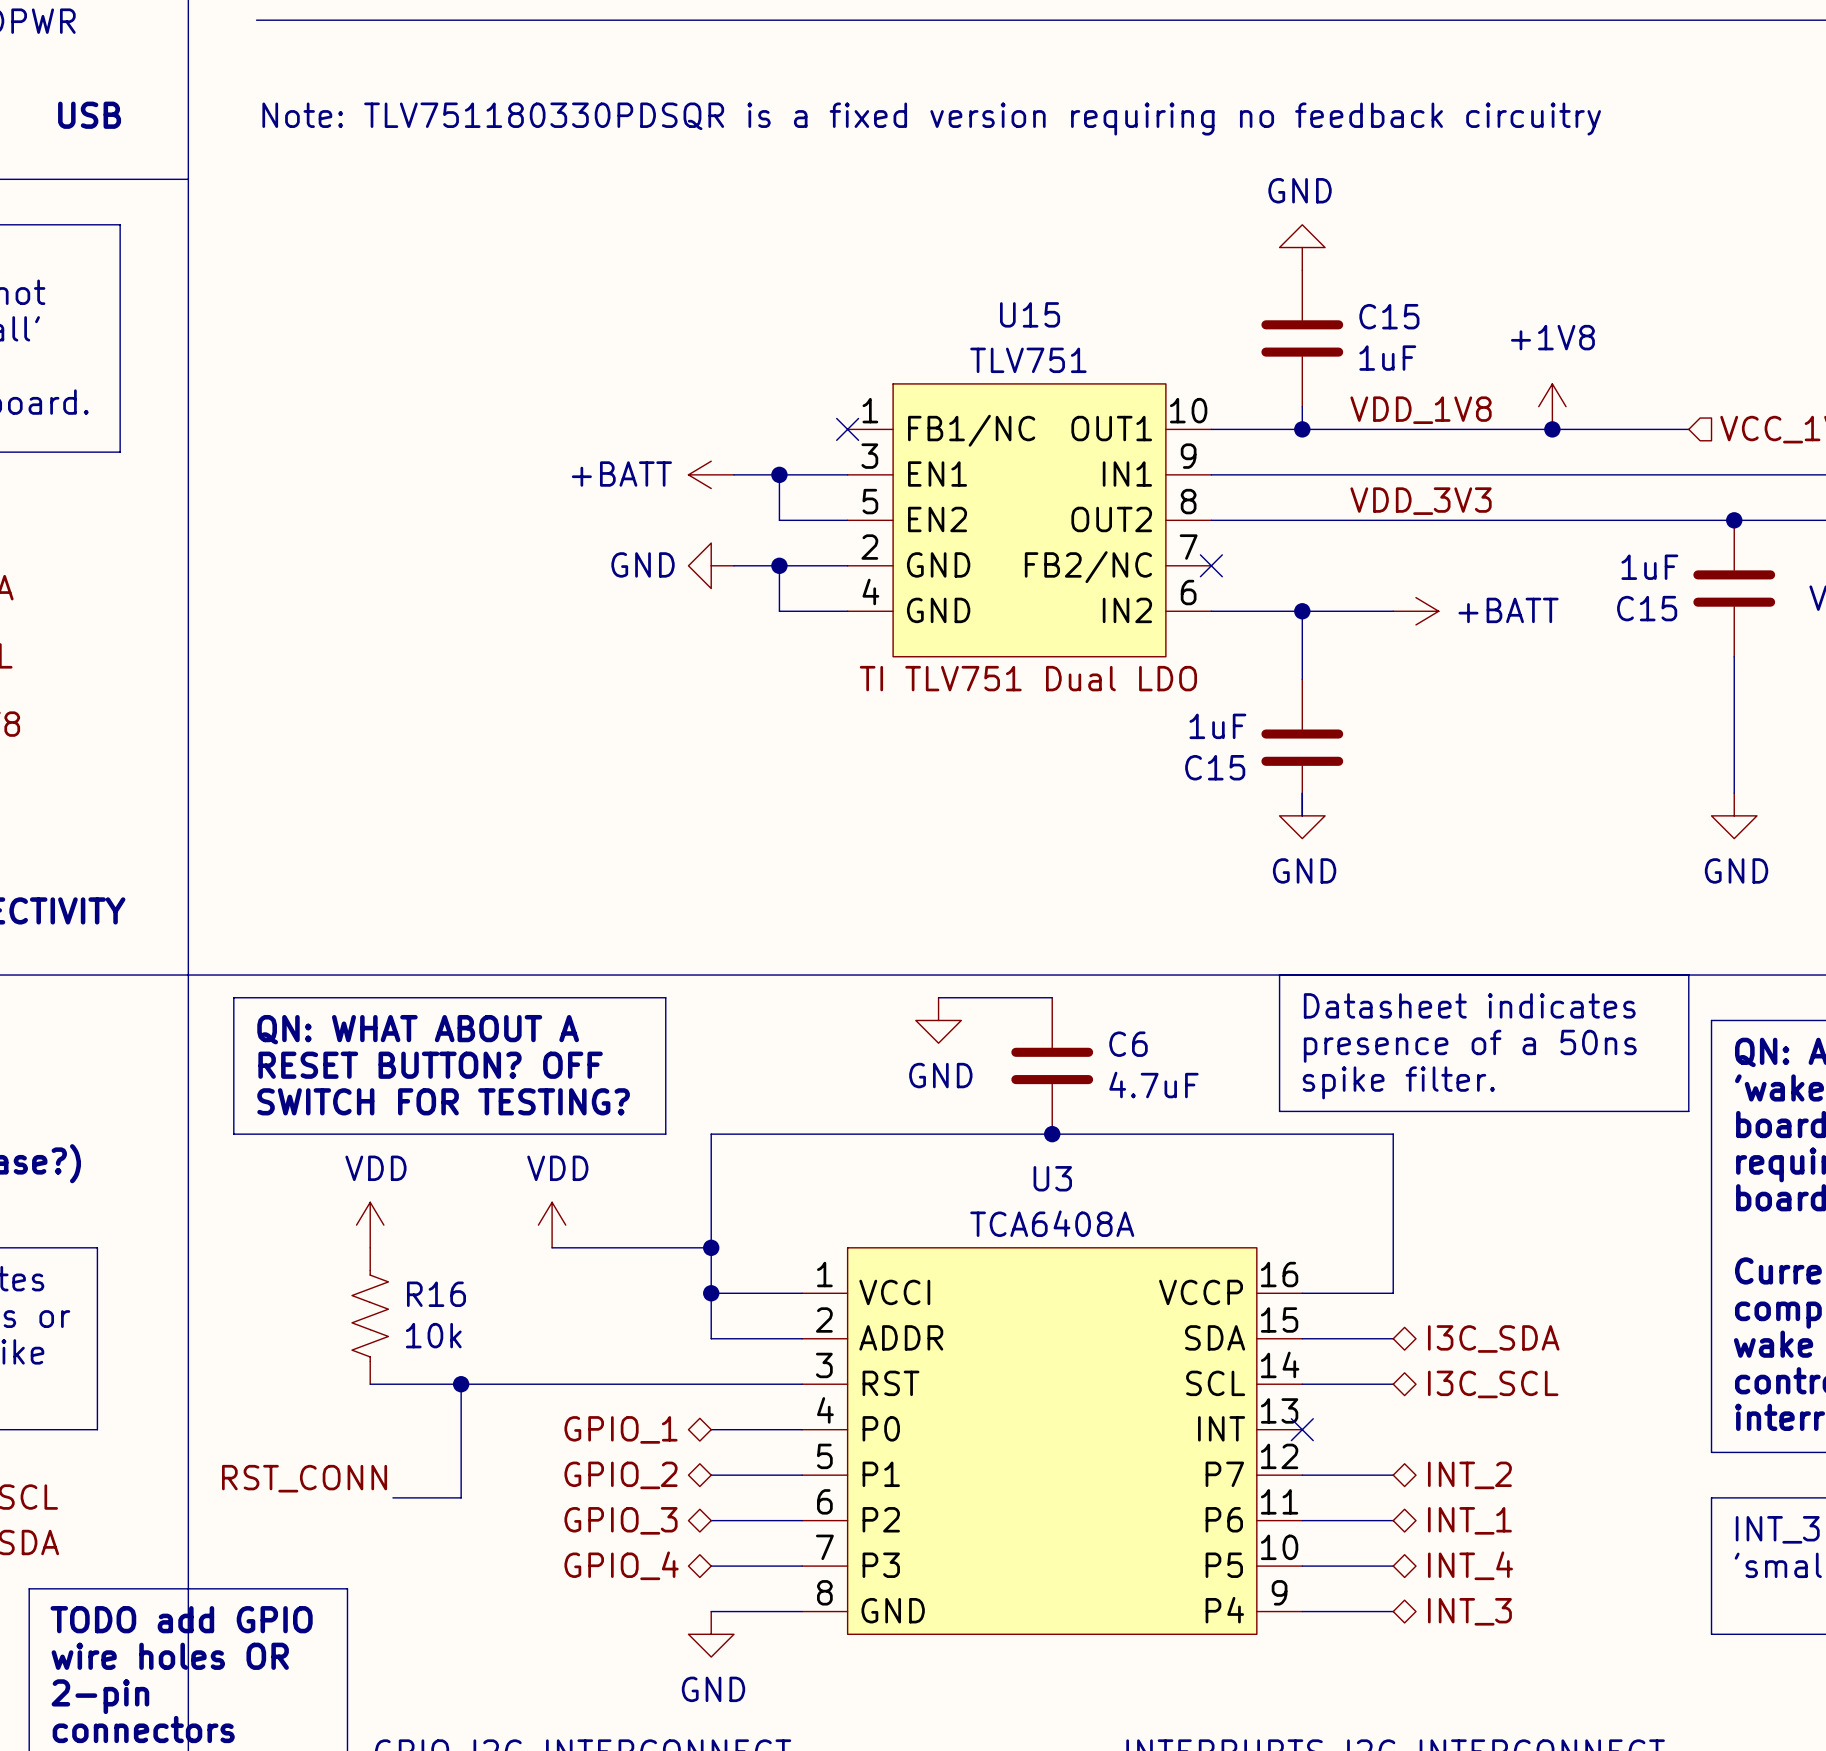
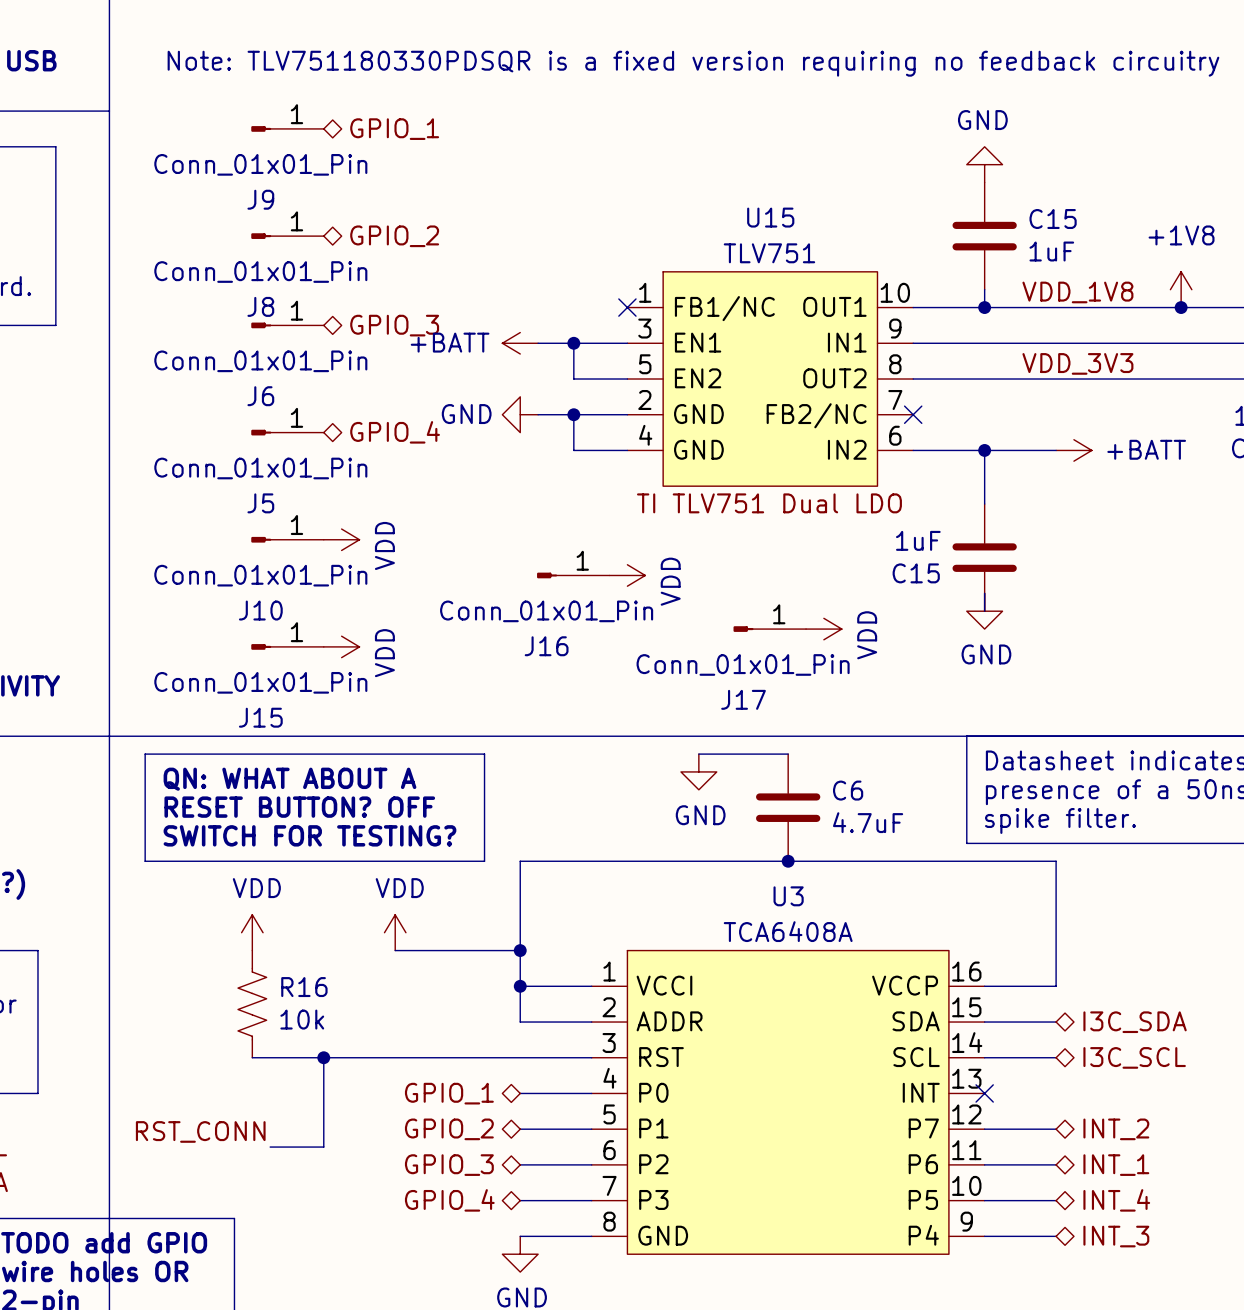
J9: none -> Conn_01x01_Pin (287, 128)
hierarchical label: none -> GPIO_1 (394, 129)
J8: none -> Conn_01x01_Pin (287, 236)
hierarchical label: none -> GPIO_2 (394, 236)
J6: none -> Conn_01x01_Pin (287, 325)
hierarchical label: none -> GPIO_3 (394, 325)
J5: none -> Conn_01x01_Pin (287, 432)
hierarchical label: none -> GPIO_4 (395, 432)
J10: none -> Conn_01x01_Pin (287, 539)
power symbol: none -> VDD (341, 539)
J16: none -> Conn_01x01_Pin (573, 575)
power symbol: none -> VDD (627, 575)
J17: none -> Conn_01x01_Pin (769, 629)
power symbol: none -> VDD (823, 629)
J15: none -> Conn_01x01_Pin (287, 646)
power symbol: none -> VDD (341, 646)

